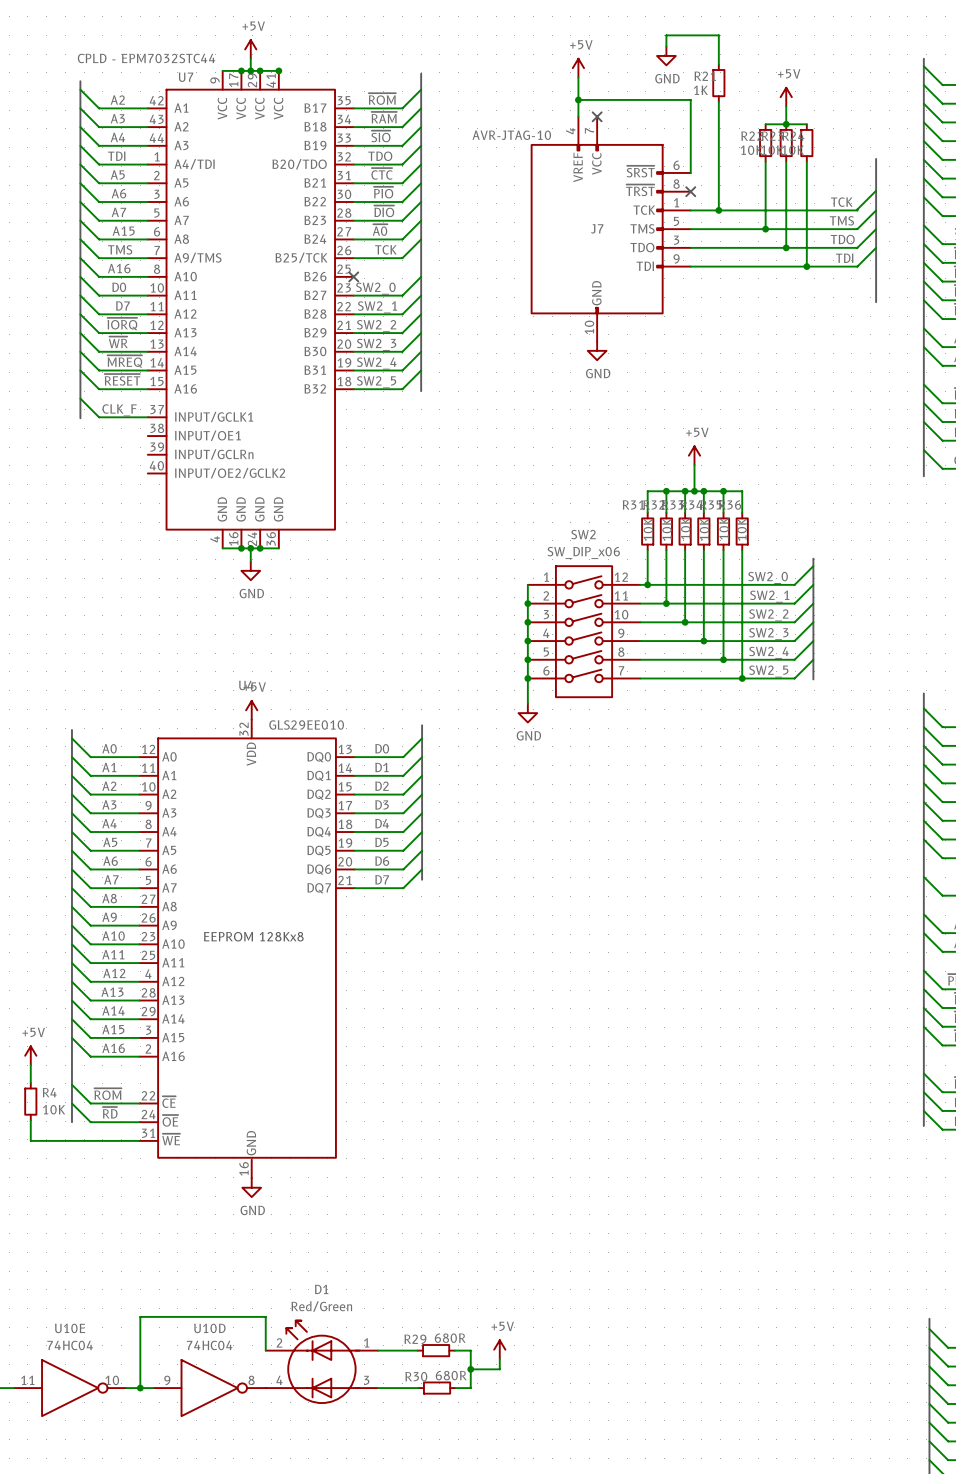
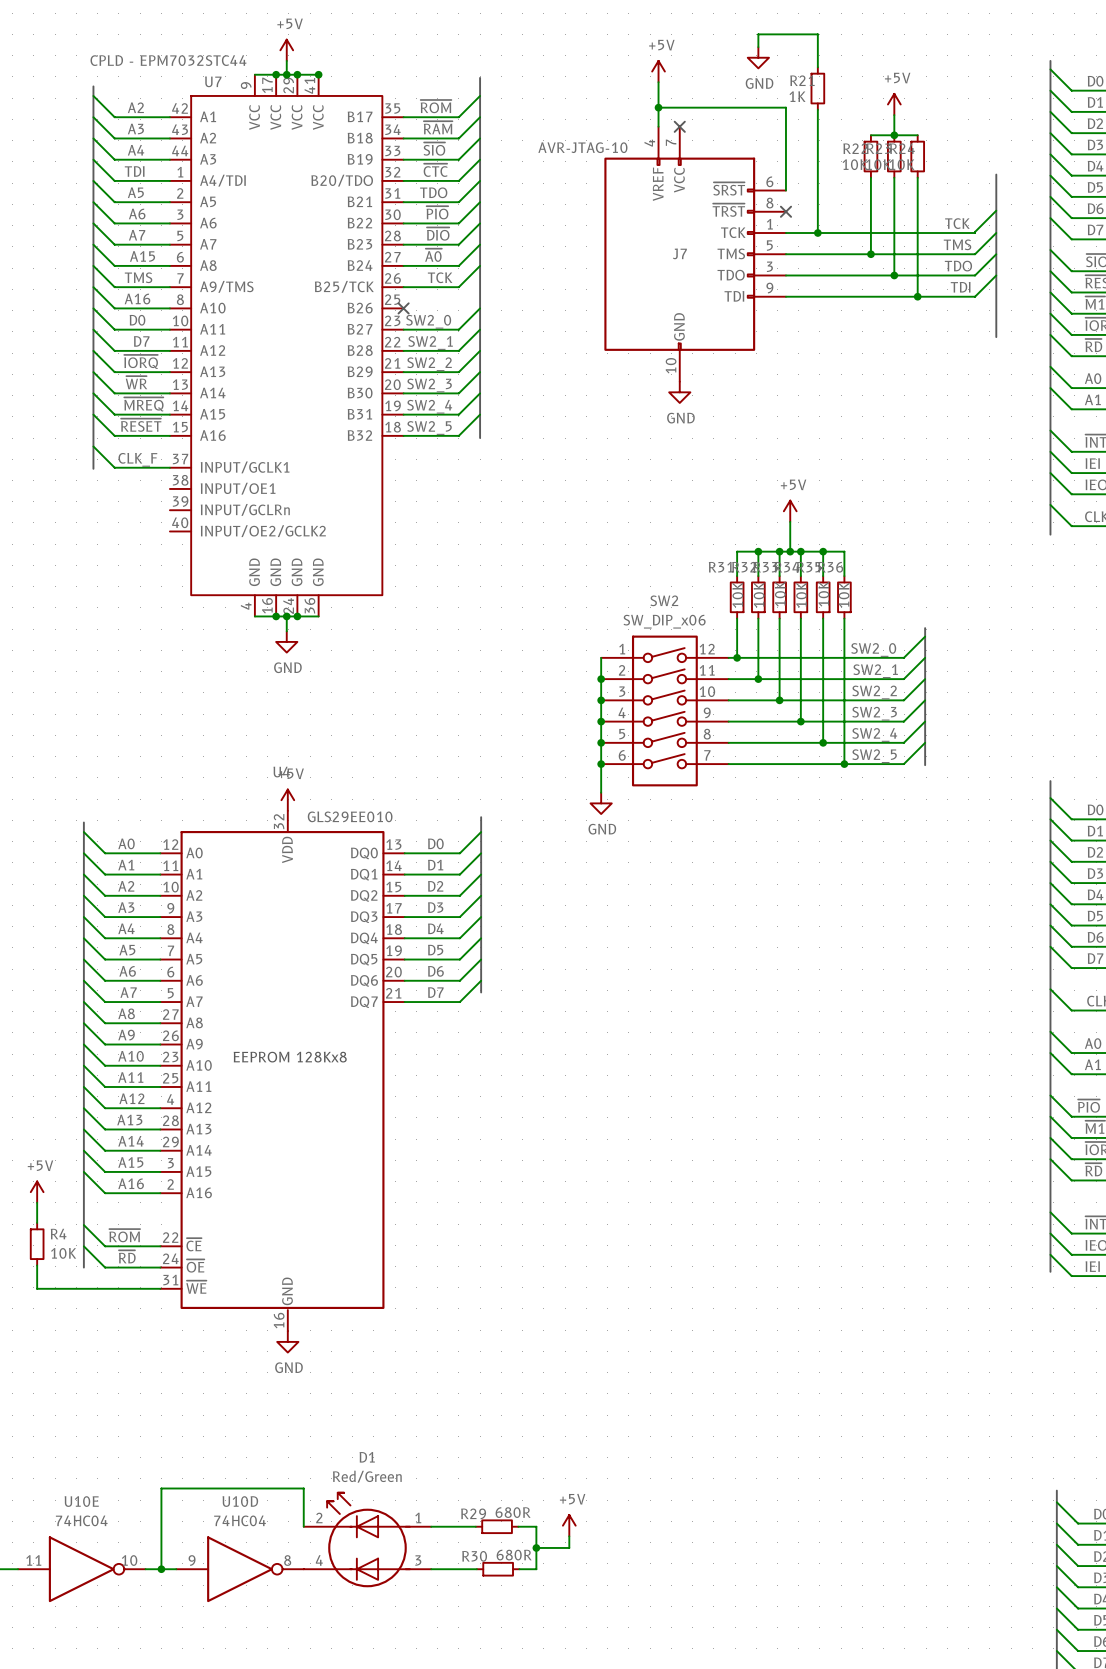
label: TDO (380, 156) -> ~{CTC} (435, 170)
label: ~{CTC} (382, 173) -> TDO (433, 192)

